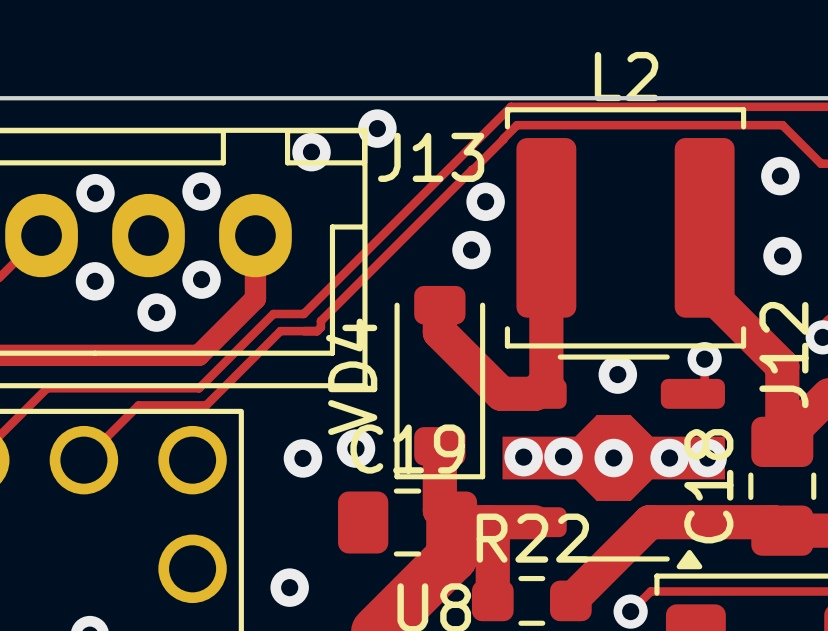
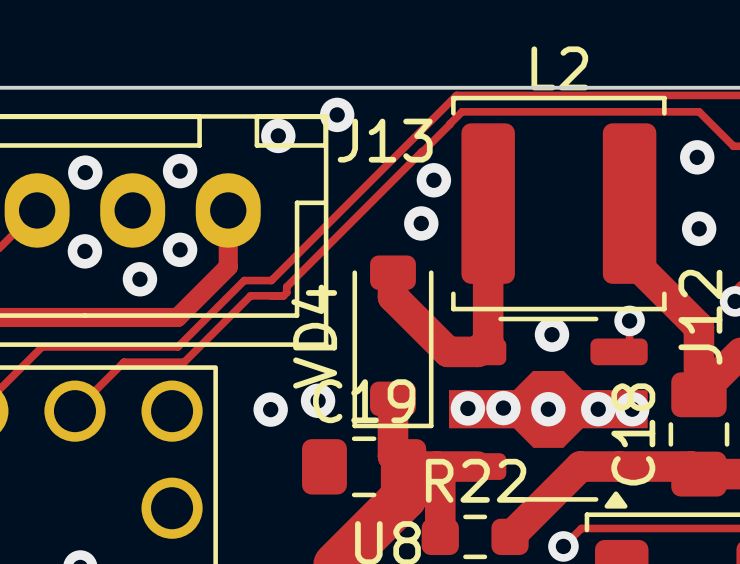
via: (289, 587) -> none

